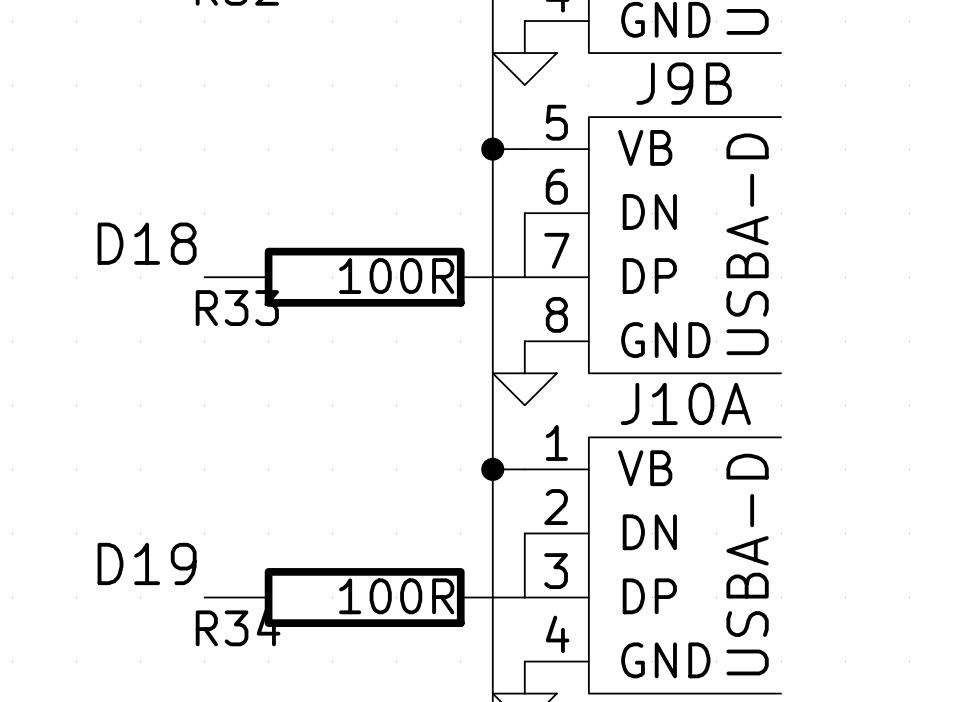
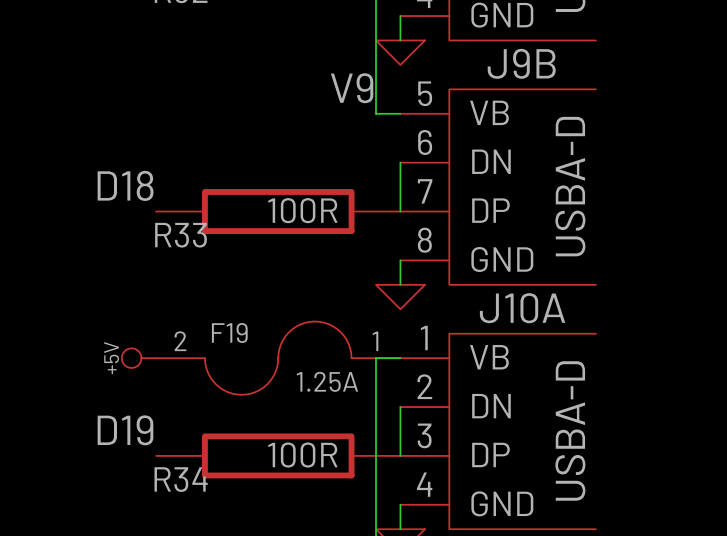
label: none -> V9 (352, 88)
wire: (492, 149) (492, 469) -> none
junction: (492, 149) -> none
power symbol: none -> +5V (138, 358)
F19: none -> 1.25A (278, 358)
junction: (492, 469) -> none

